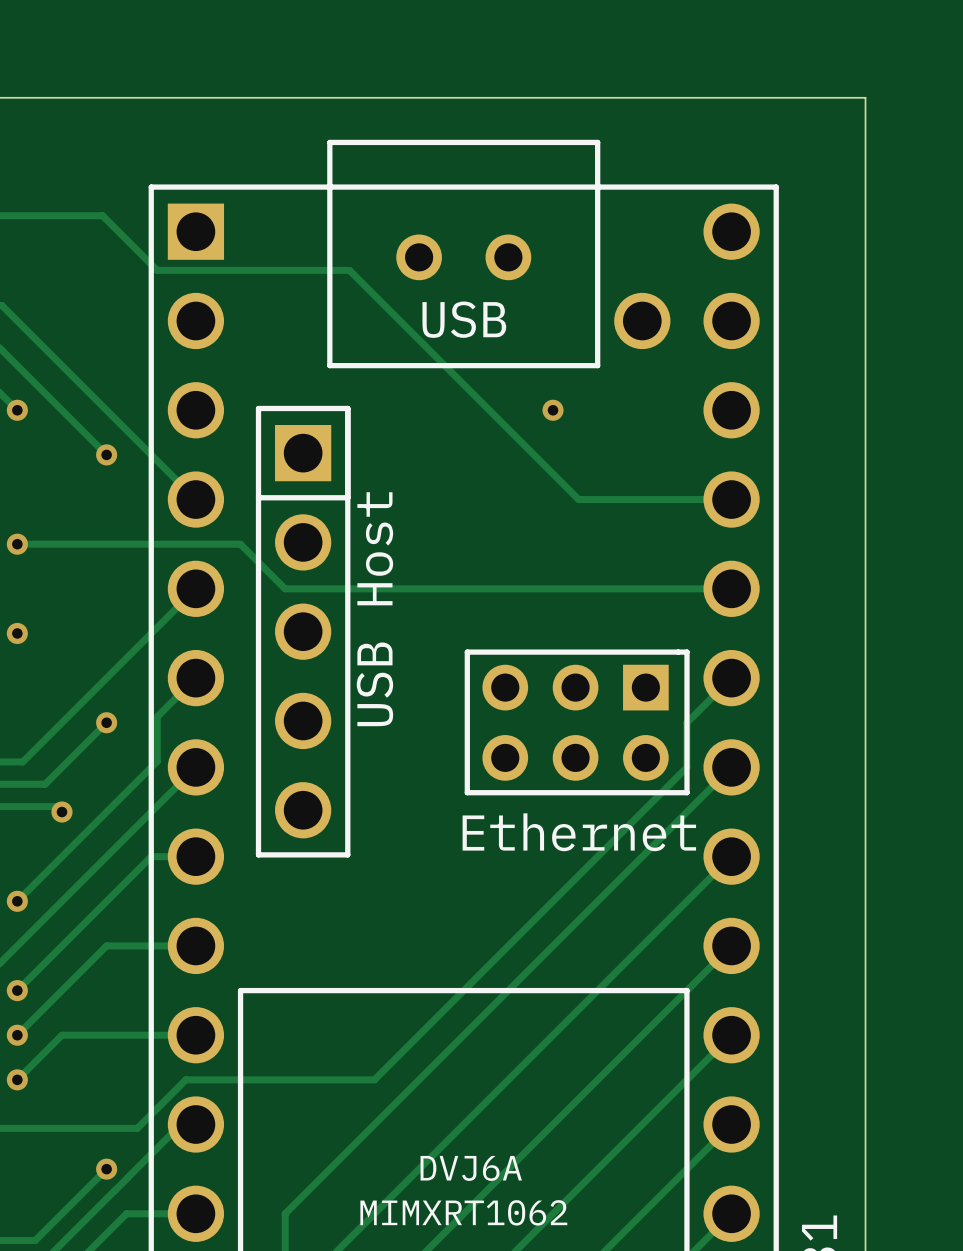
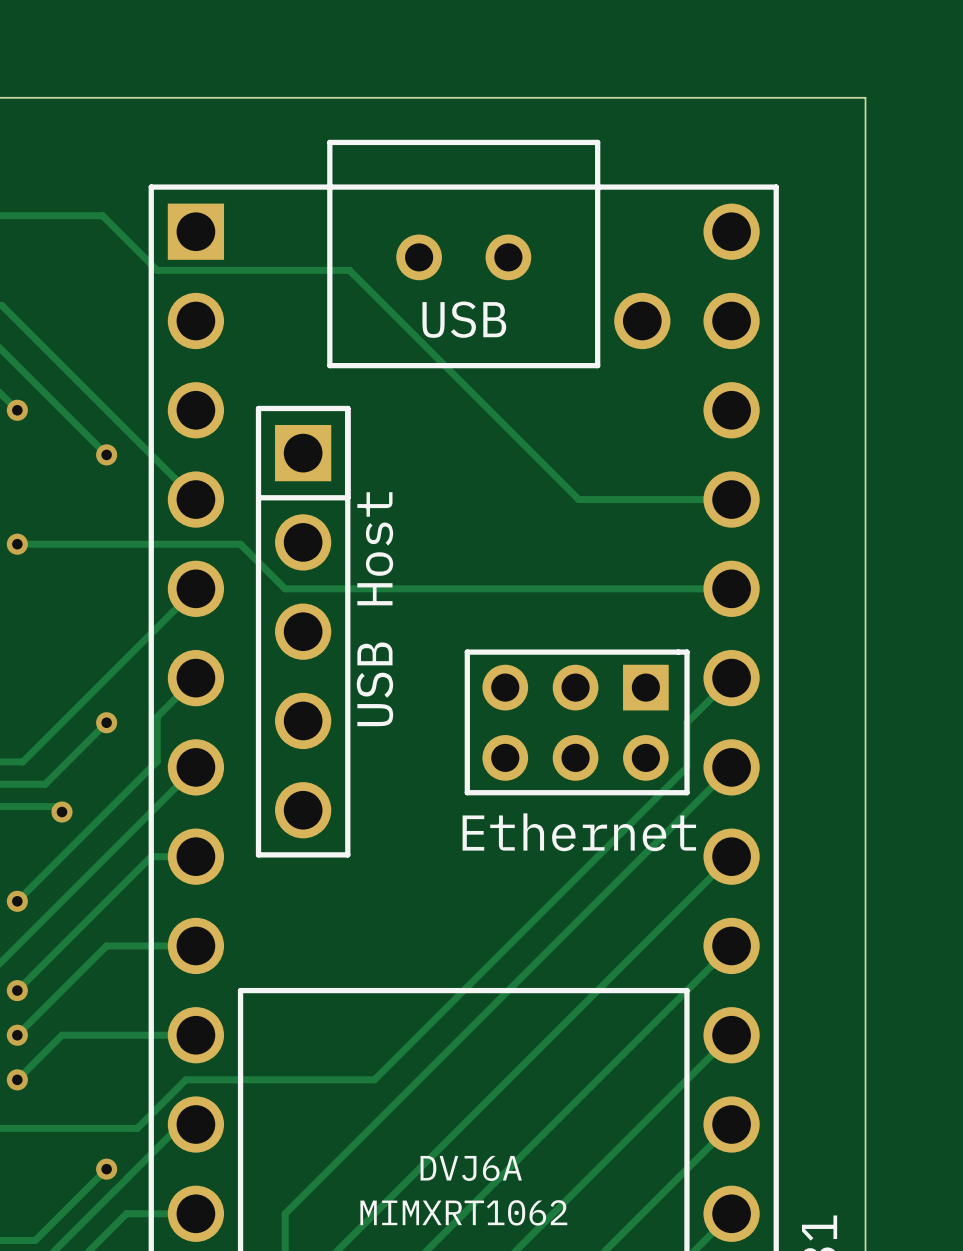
via: (553, 410) -> none
via: (17, 633) -> none

